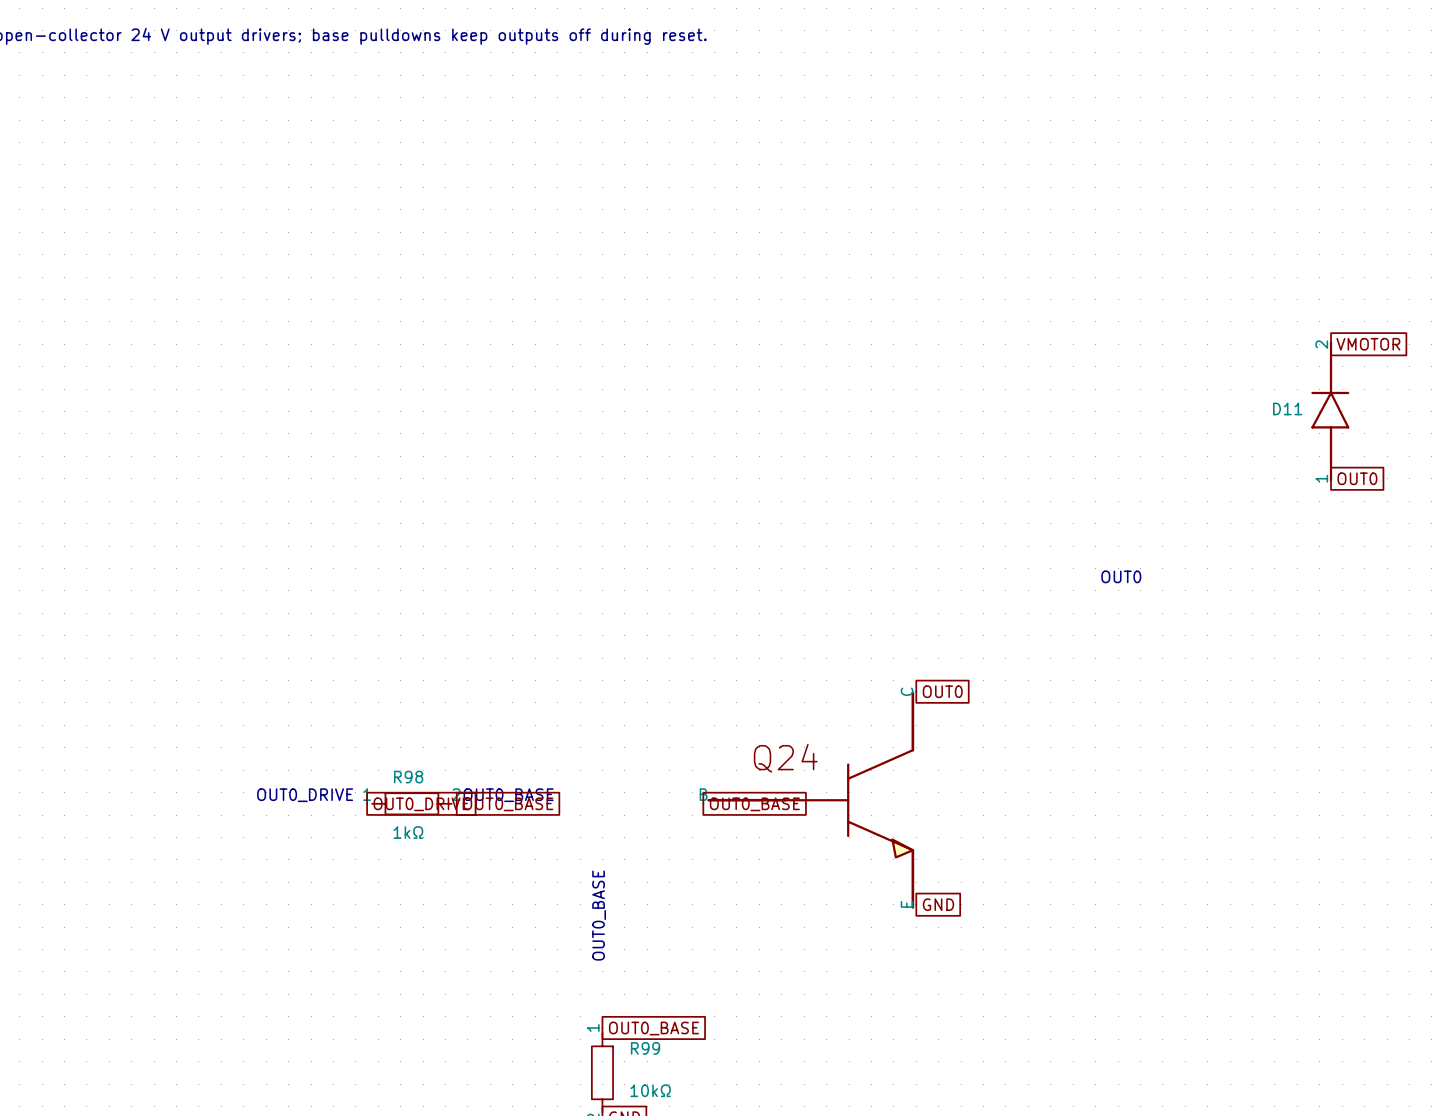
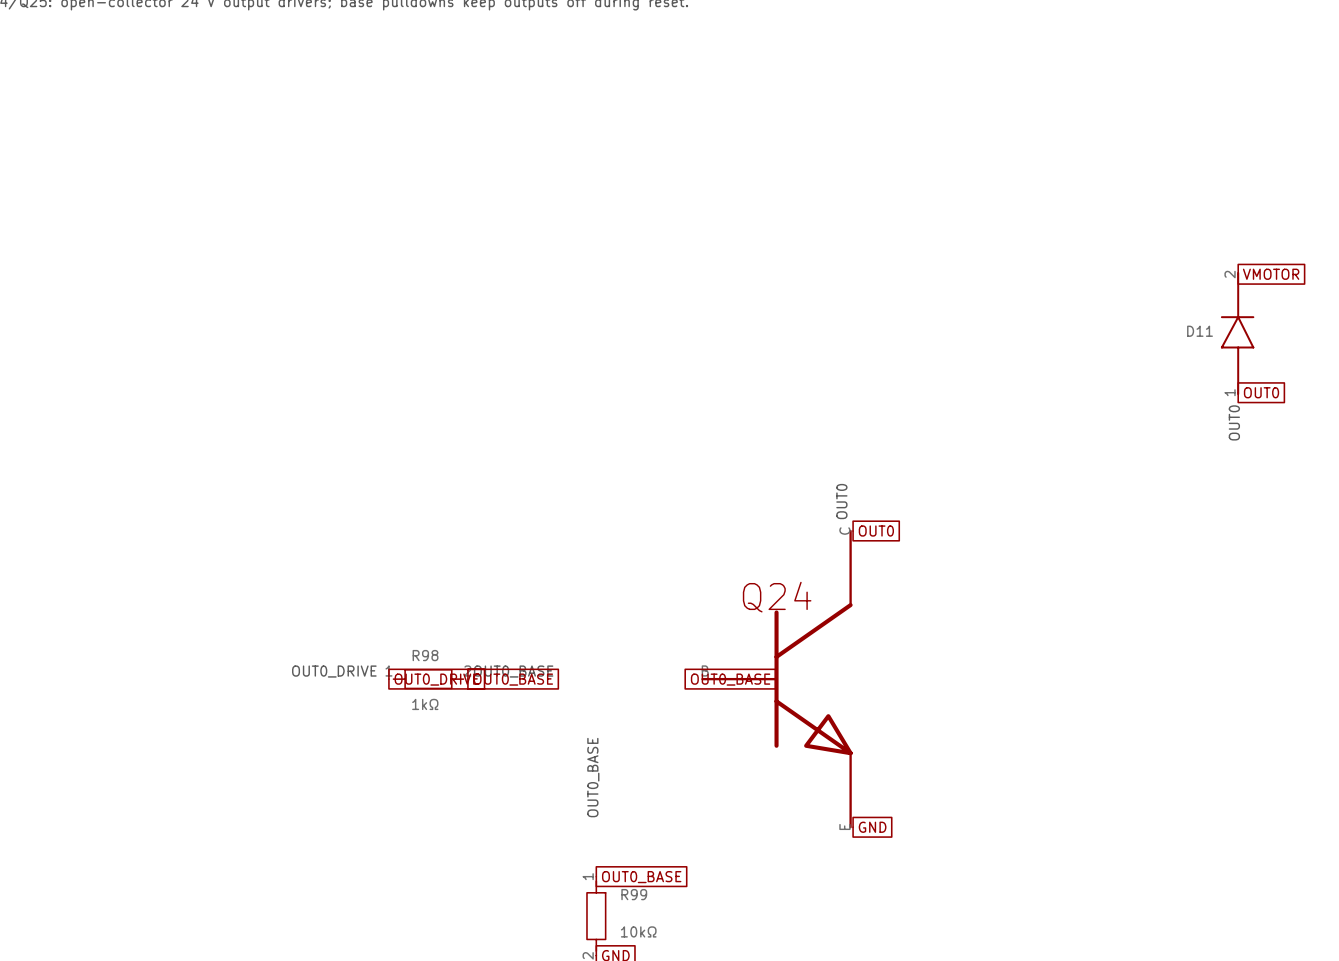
text: none -> OUT0 (1234, 422)
text: OUT0 (1121, 576) -> none
text: none -> OUT0 (841, 501)
part symbol: [703, 691, 917, 909] -> [701, 529, 854, 829]
global label position: OUT0 (942, 691) -> OUT0 (876, 531)
global label position: GND (938, 904) -> GND (872, 827)

